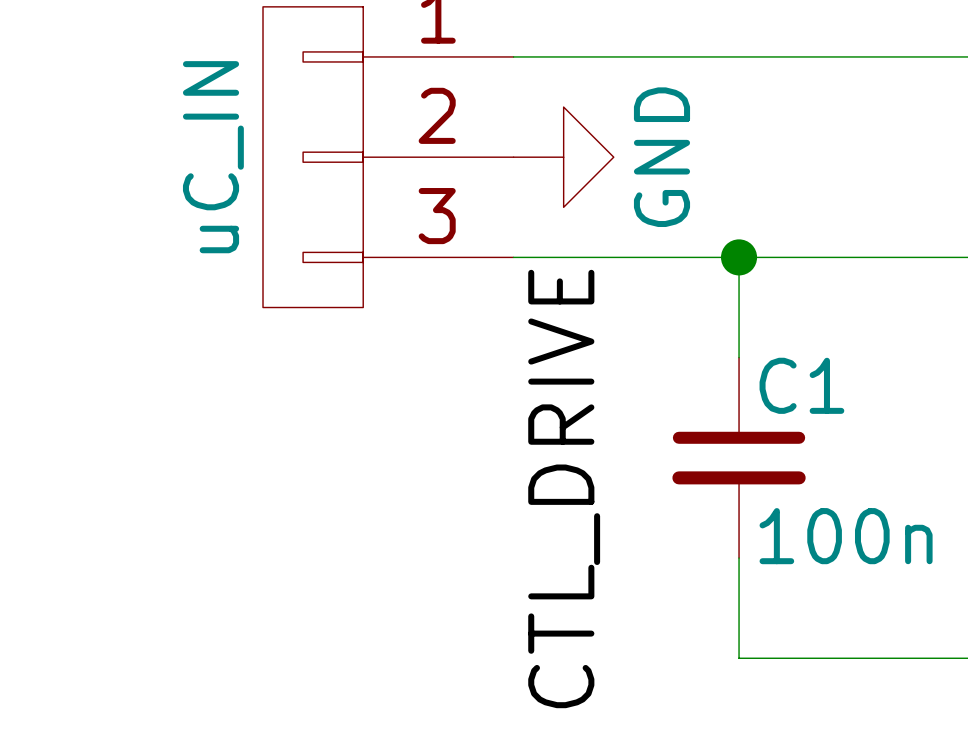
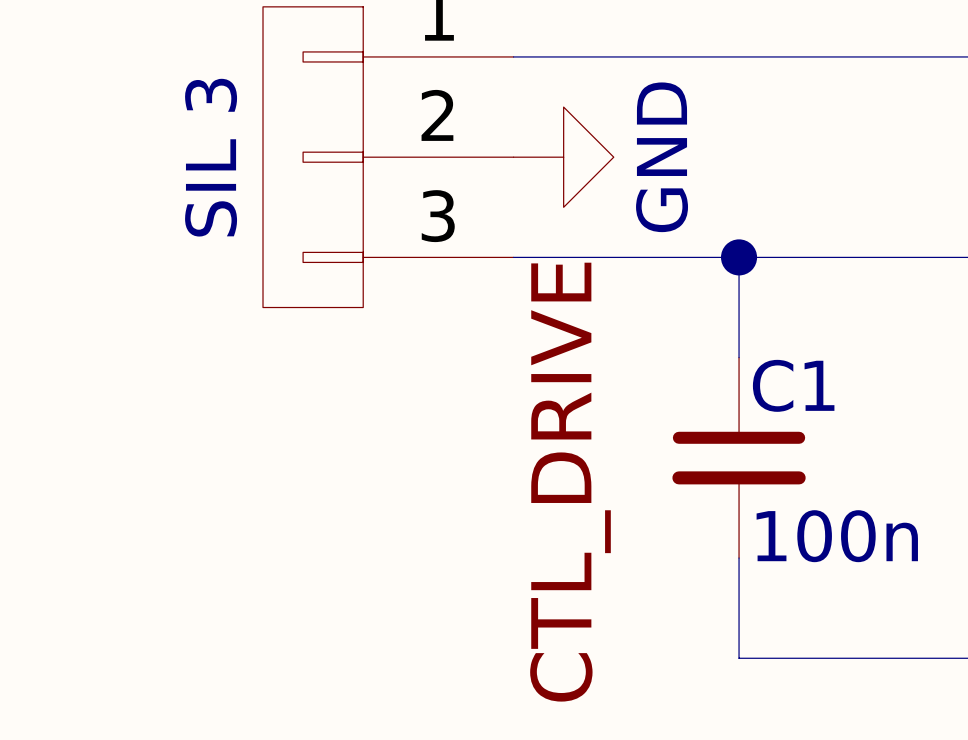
part value: uC_IN (213, 157) -> SIL 3 (211, 157)

